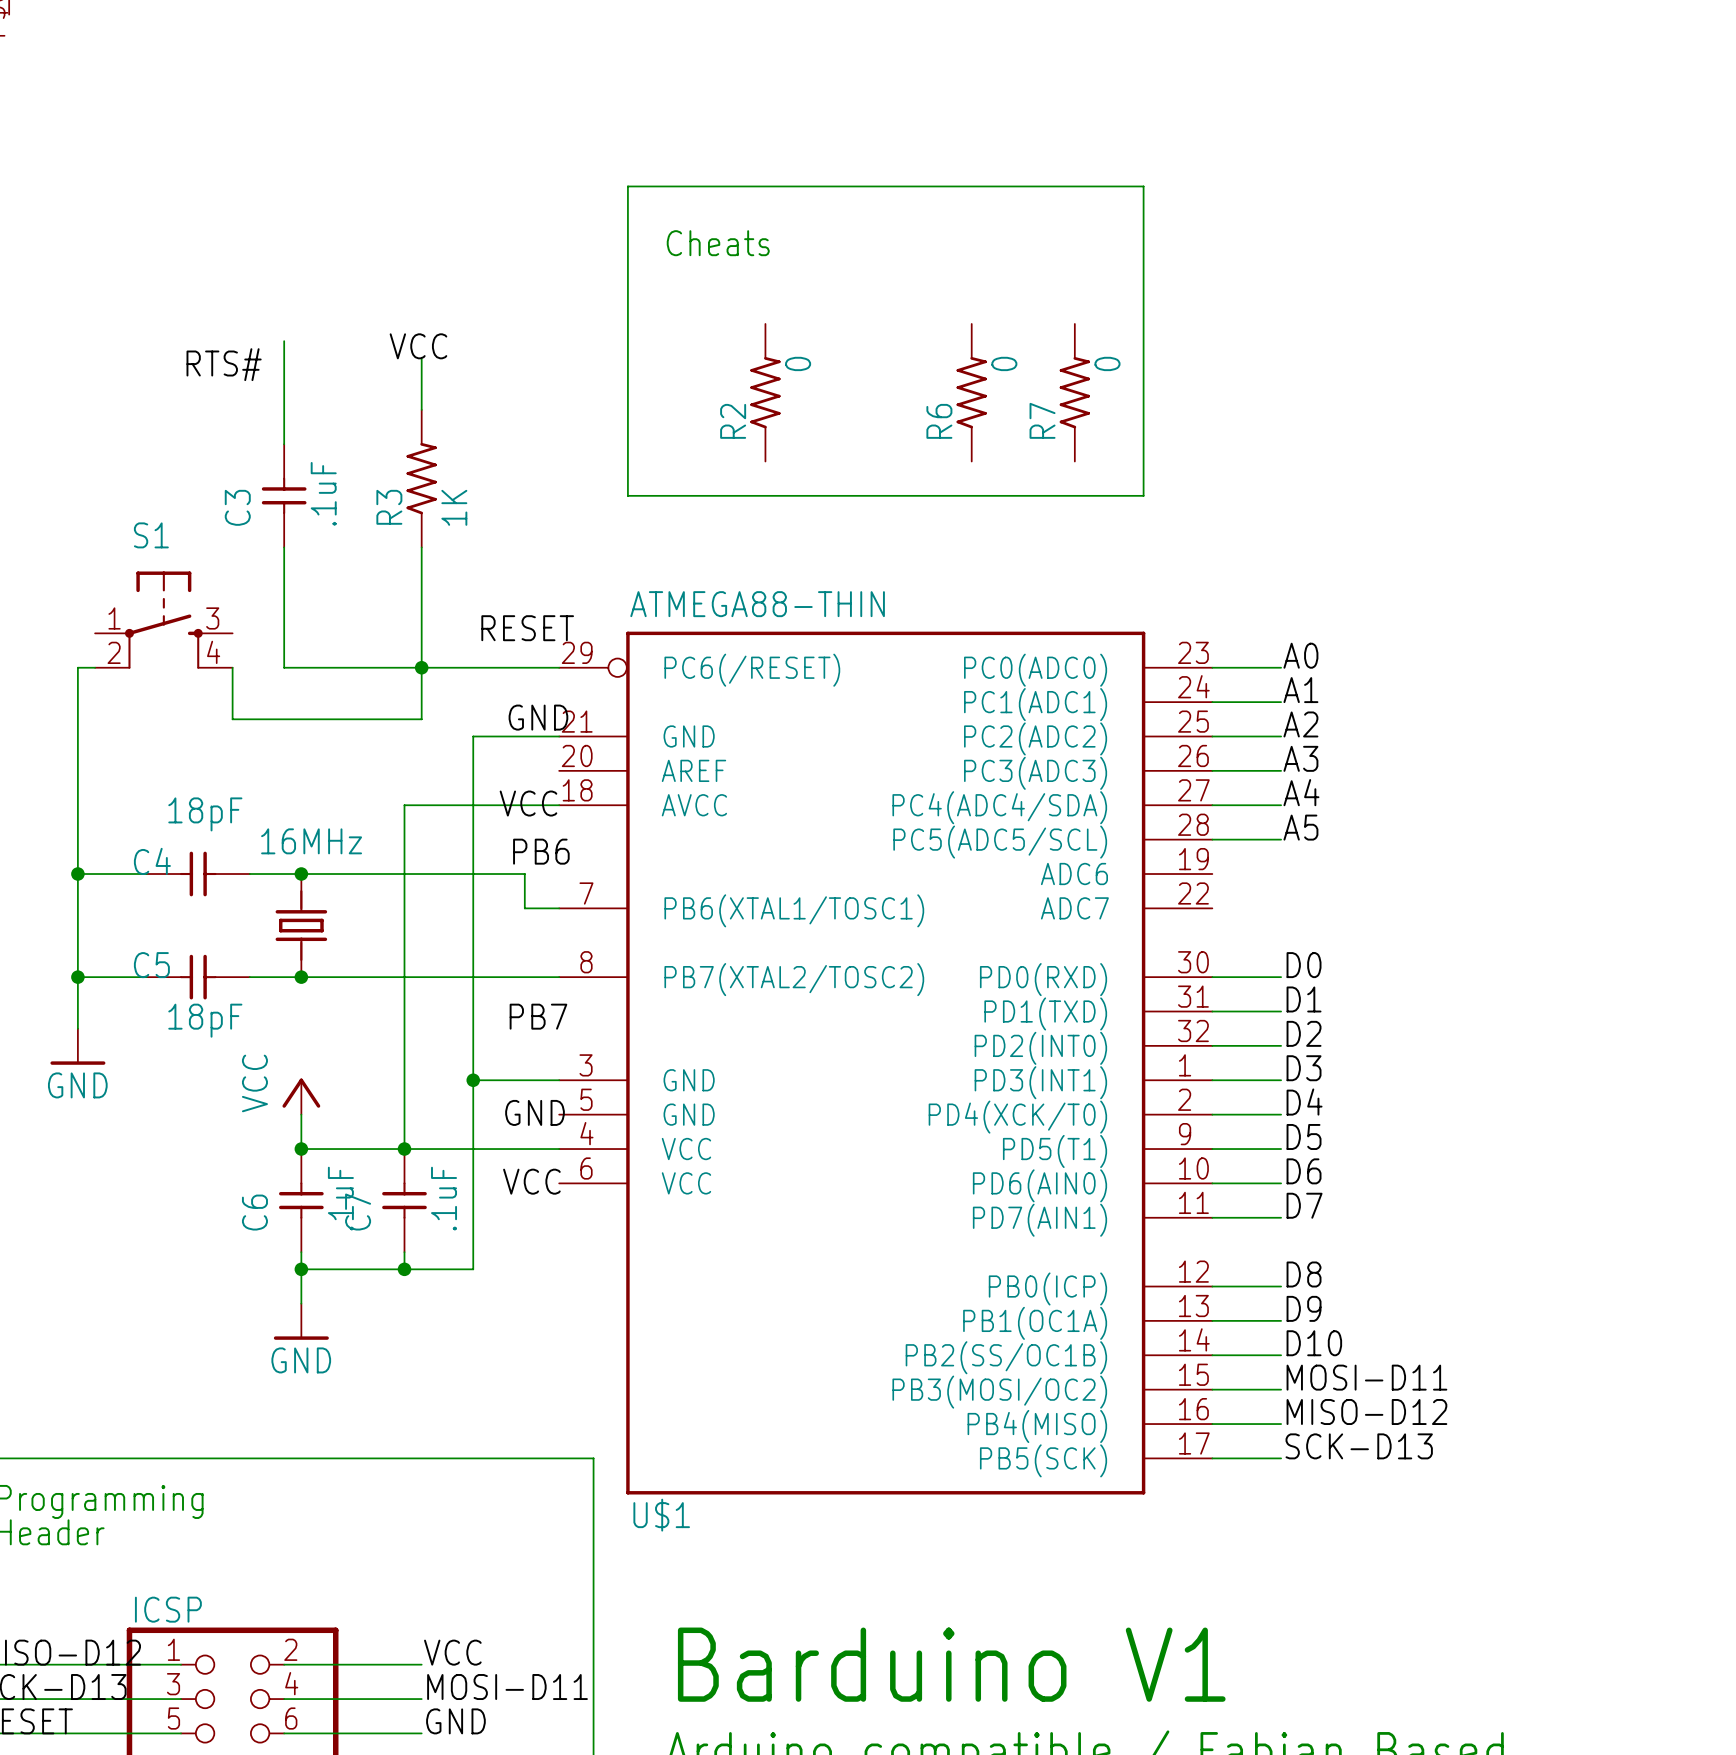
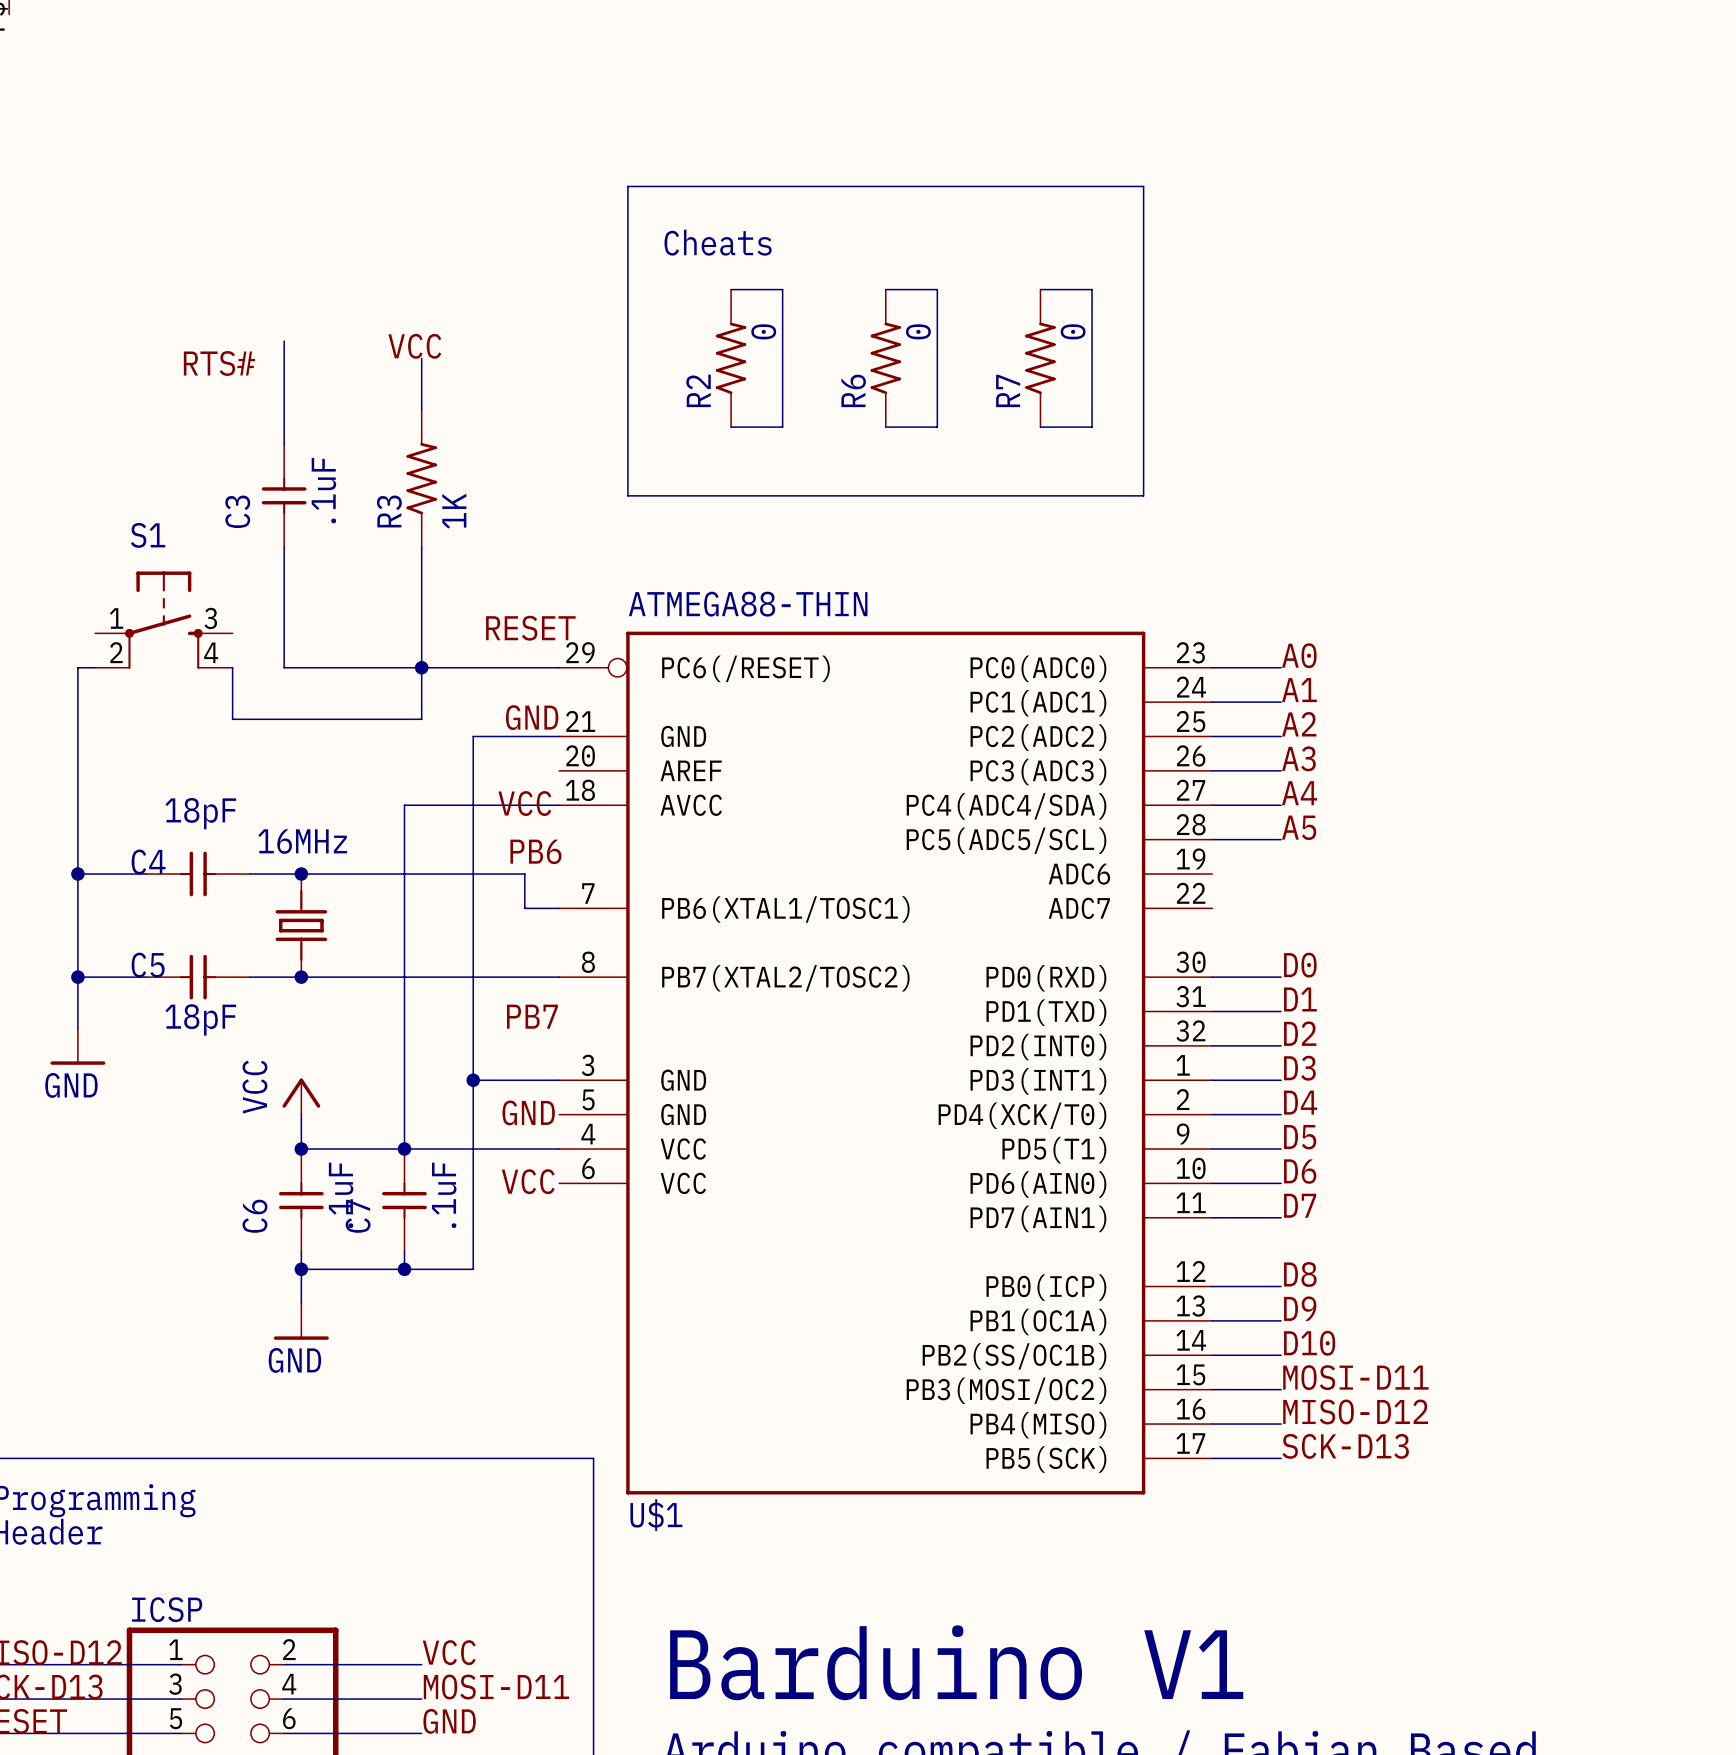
wire: none -> (731, 289) (782, 289) (782, 427) (731, 427)
wire: none -> (885, 289) (937, 289) (937, 427) (885, 427)
wire: none -> (1040, 289) (1092, 289) (1092, 427) (1040, 427)
R2 position: (765, 392) -> (731, 358)
R6 position: (971, 392) -> (885, 358)
R7 position: (1074, 392) -> (1040, 358)

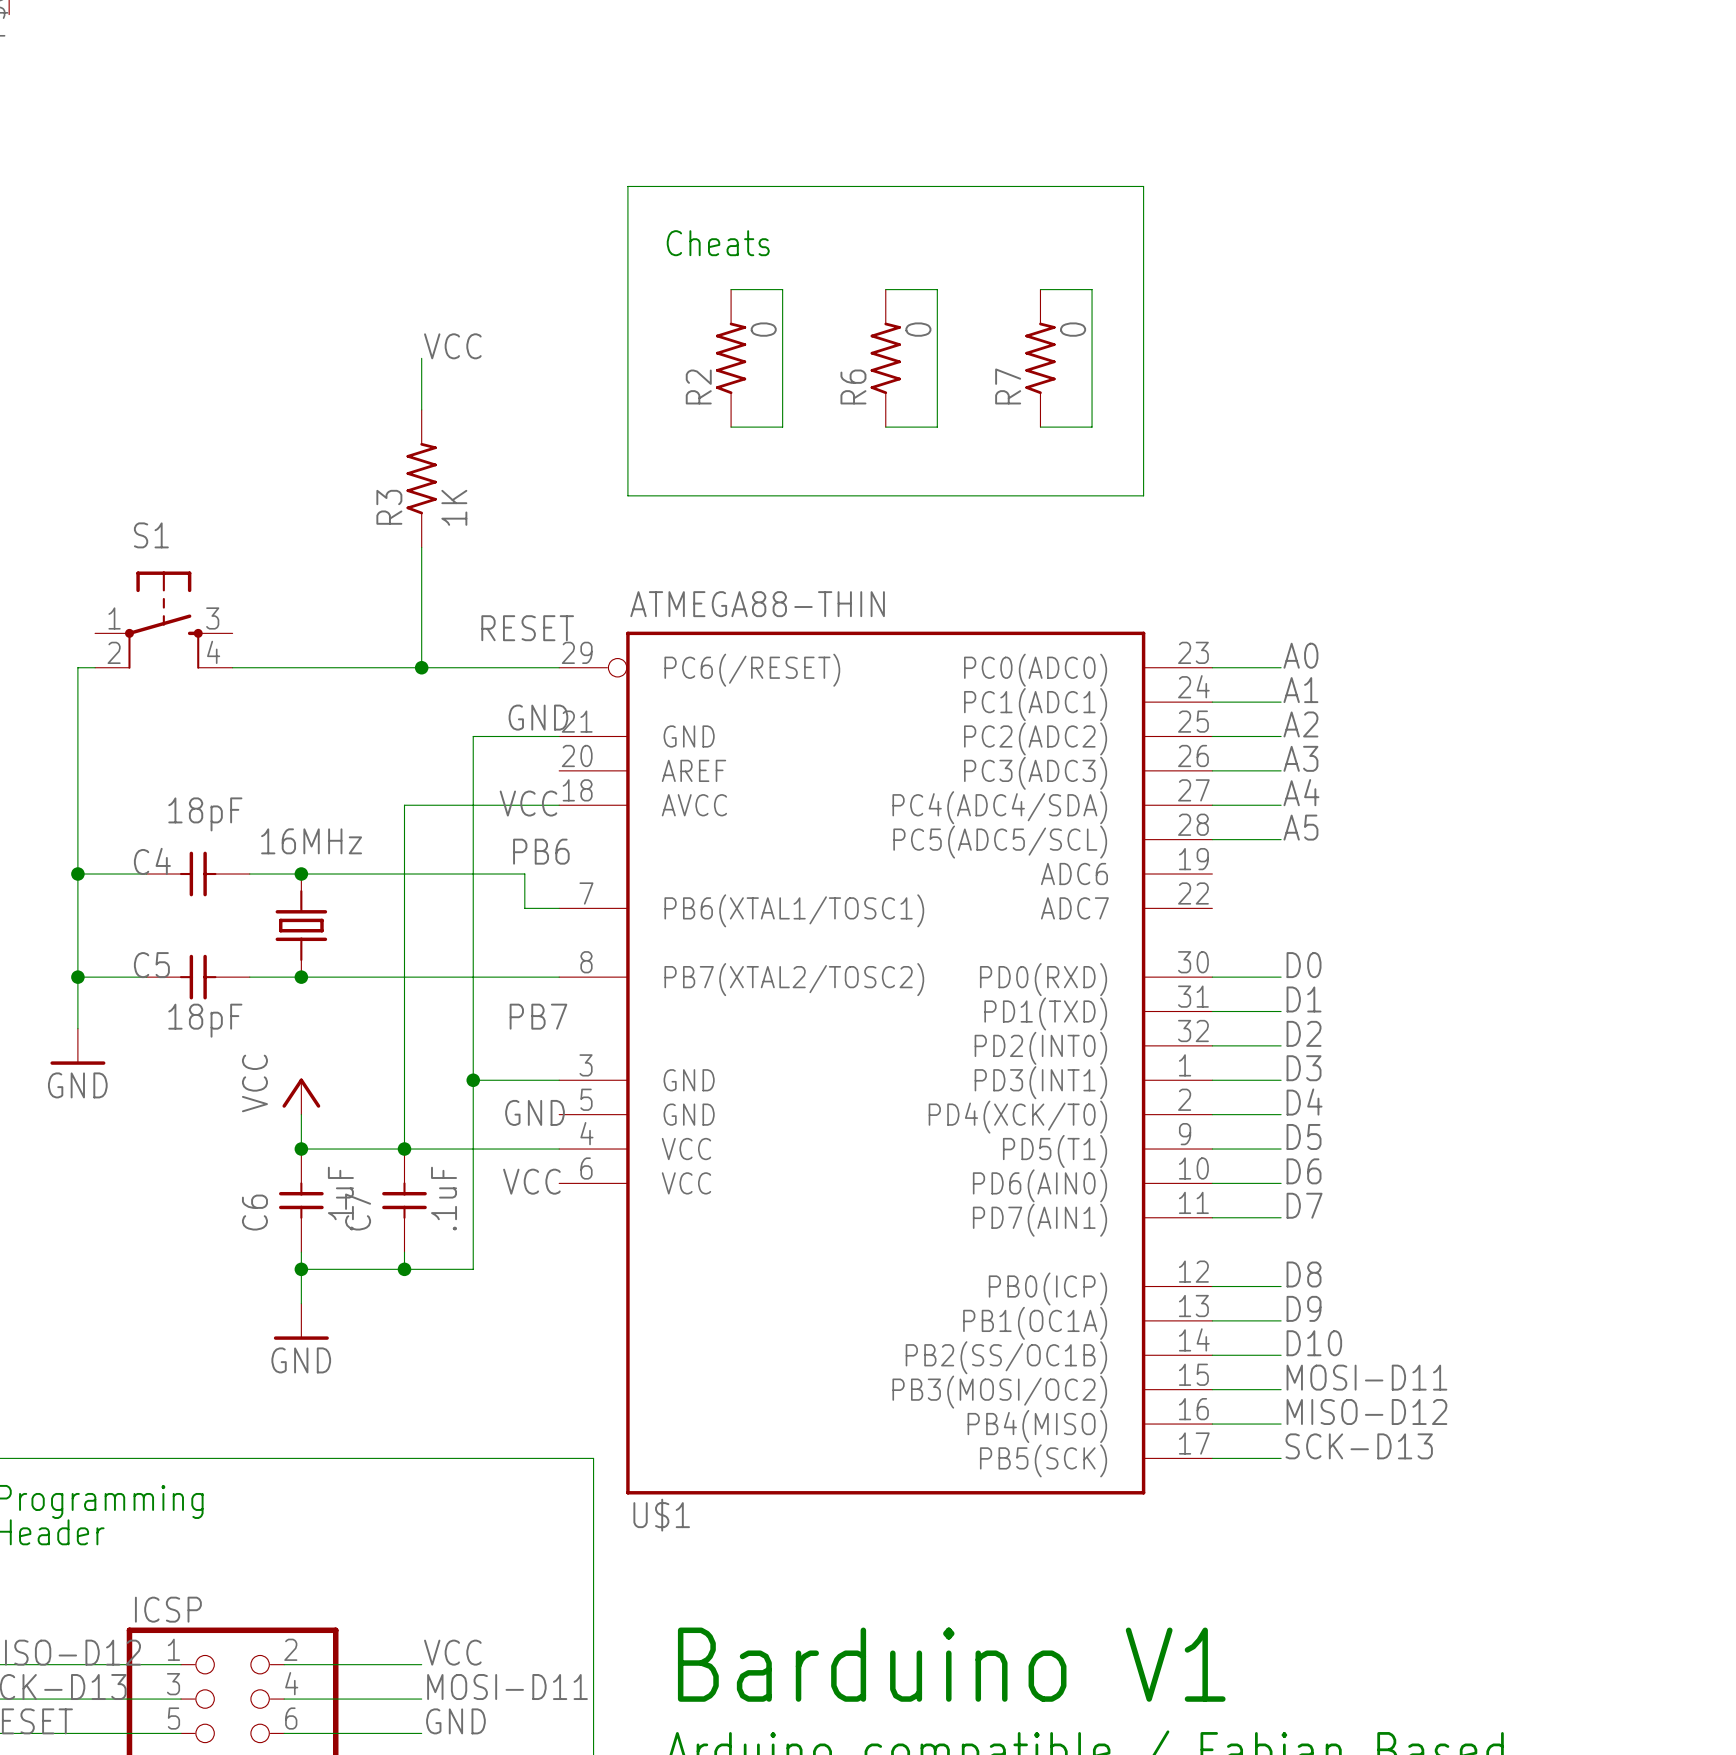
wire: (284, 341) (284, 444) -> none
label position: VCC (414, 346) -> VCC (452, 346)
label: RTS# (219, 363) -> none
C3: .1uF (284, 495) -> none
wire: (284, 547) (284, 667) -> (232, 667) (284, 667)
wire: (232, 667) (232, 719) (421, 719) (421, 667) -> none

